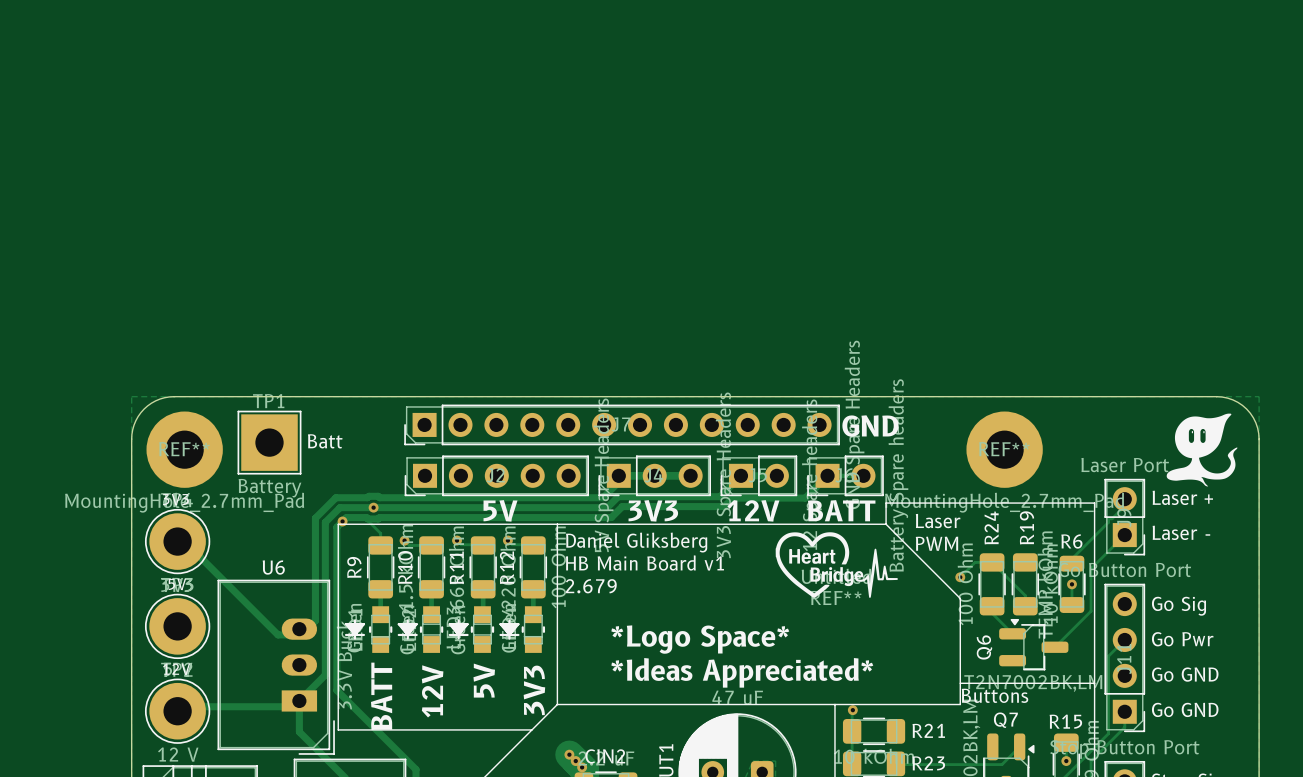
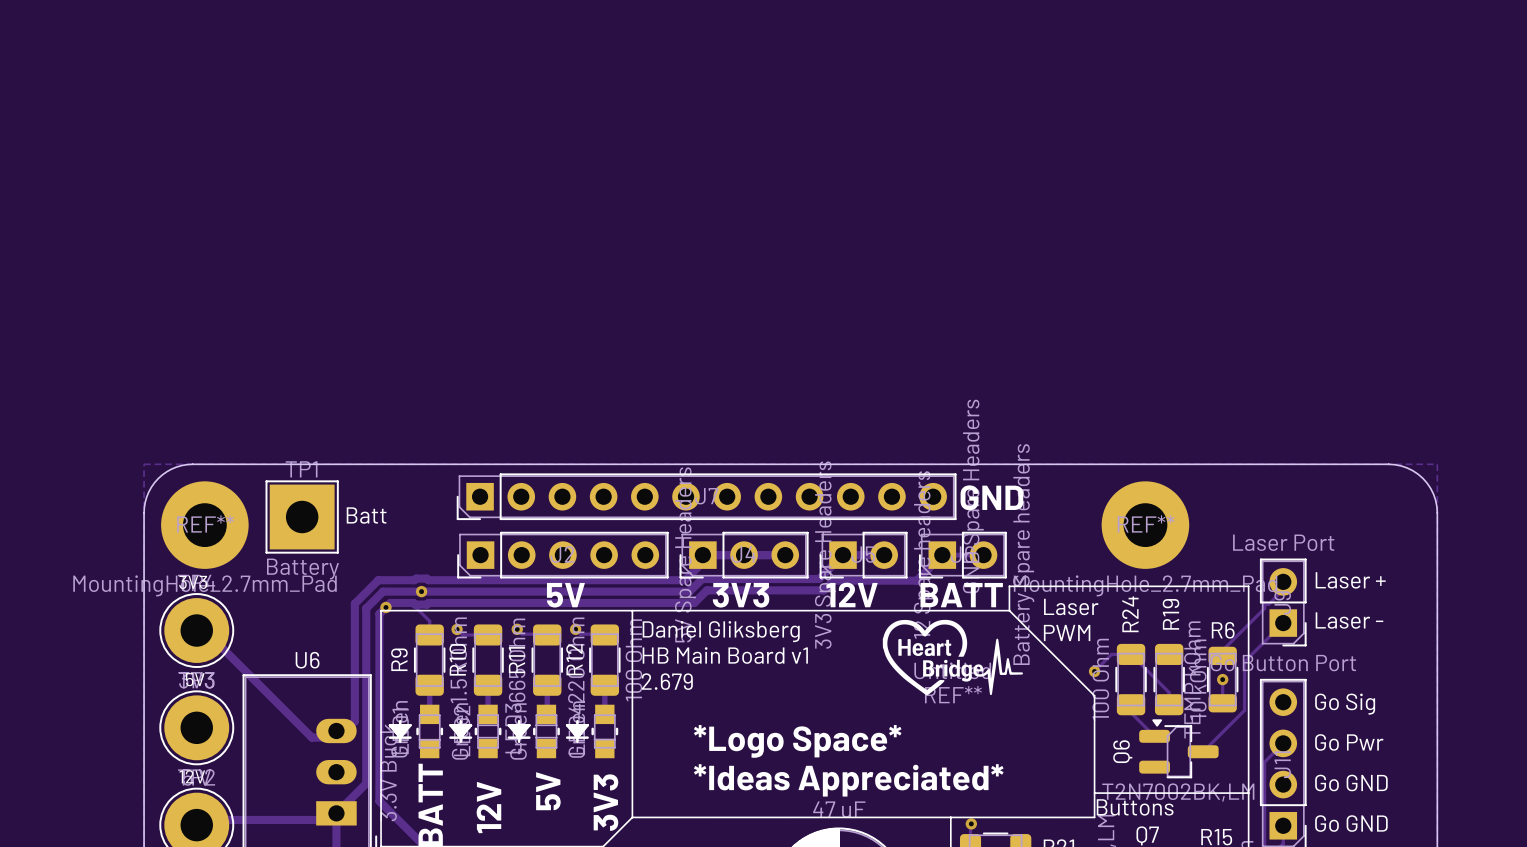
drawing: [1166, 413, 1238, 487] -> none

